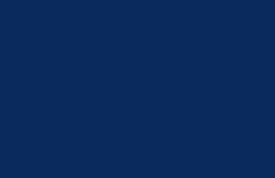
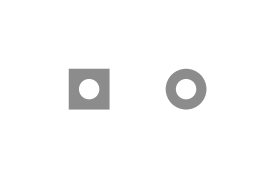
part: none -> (137, 89)

